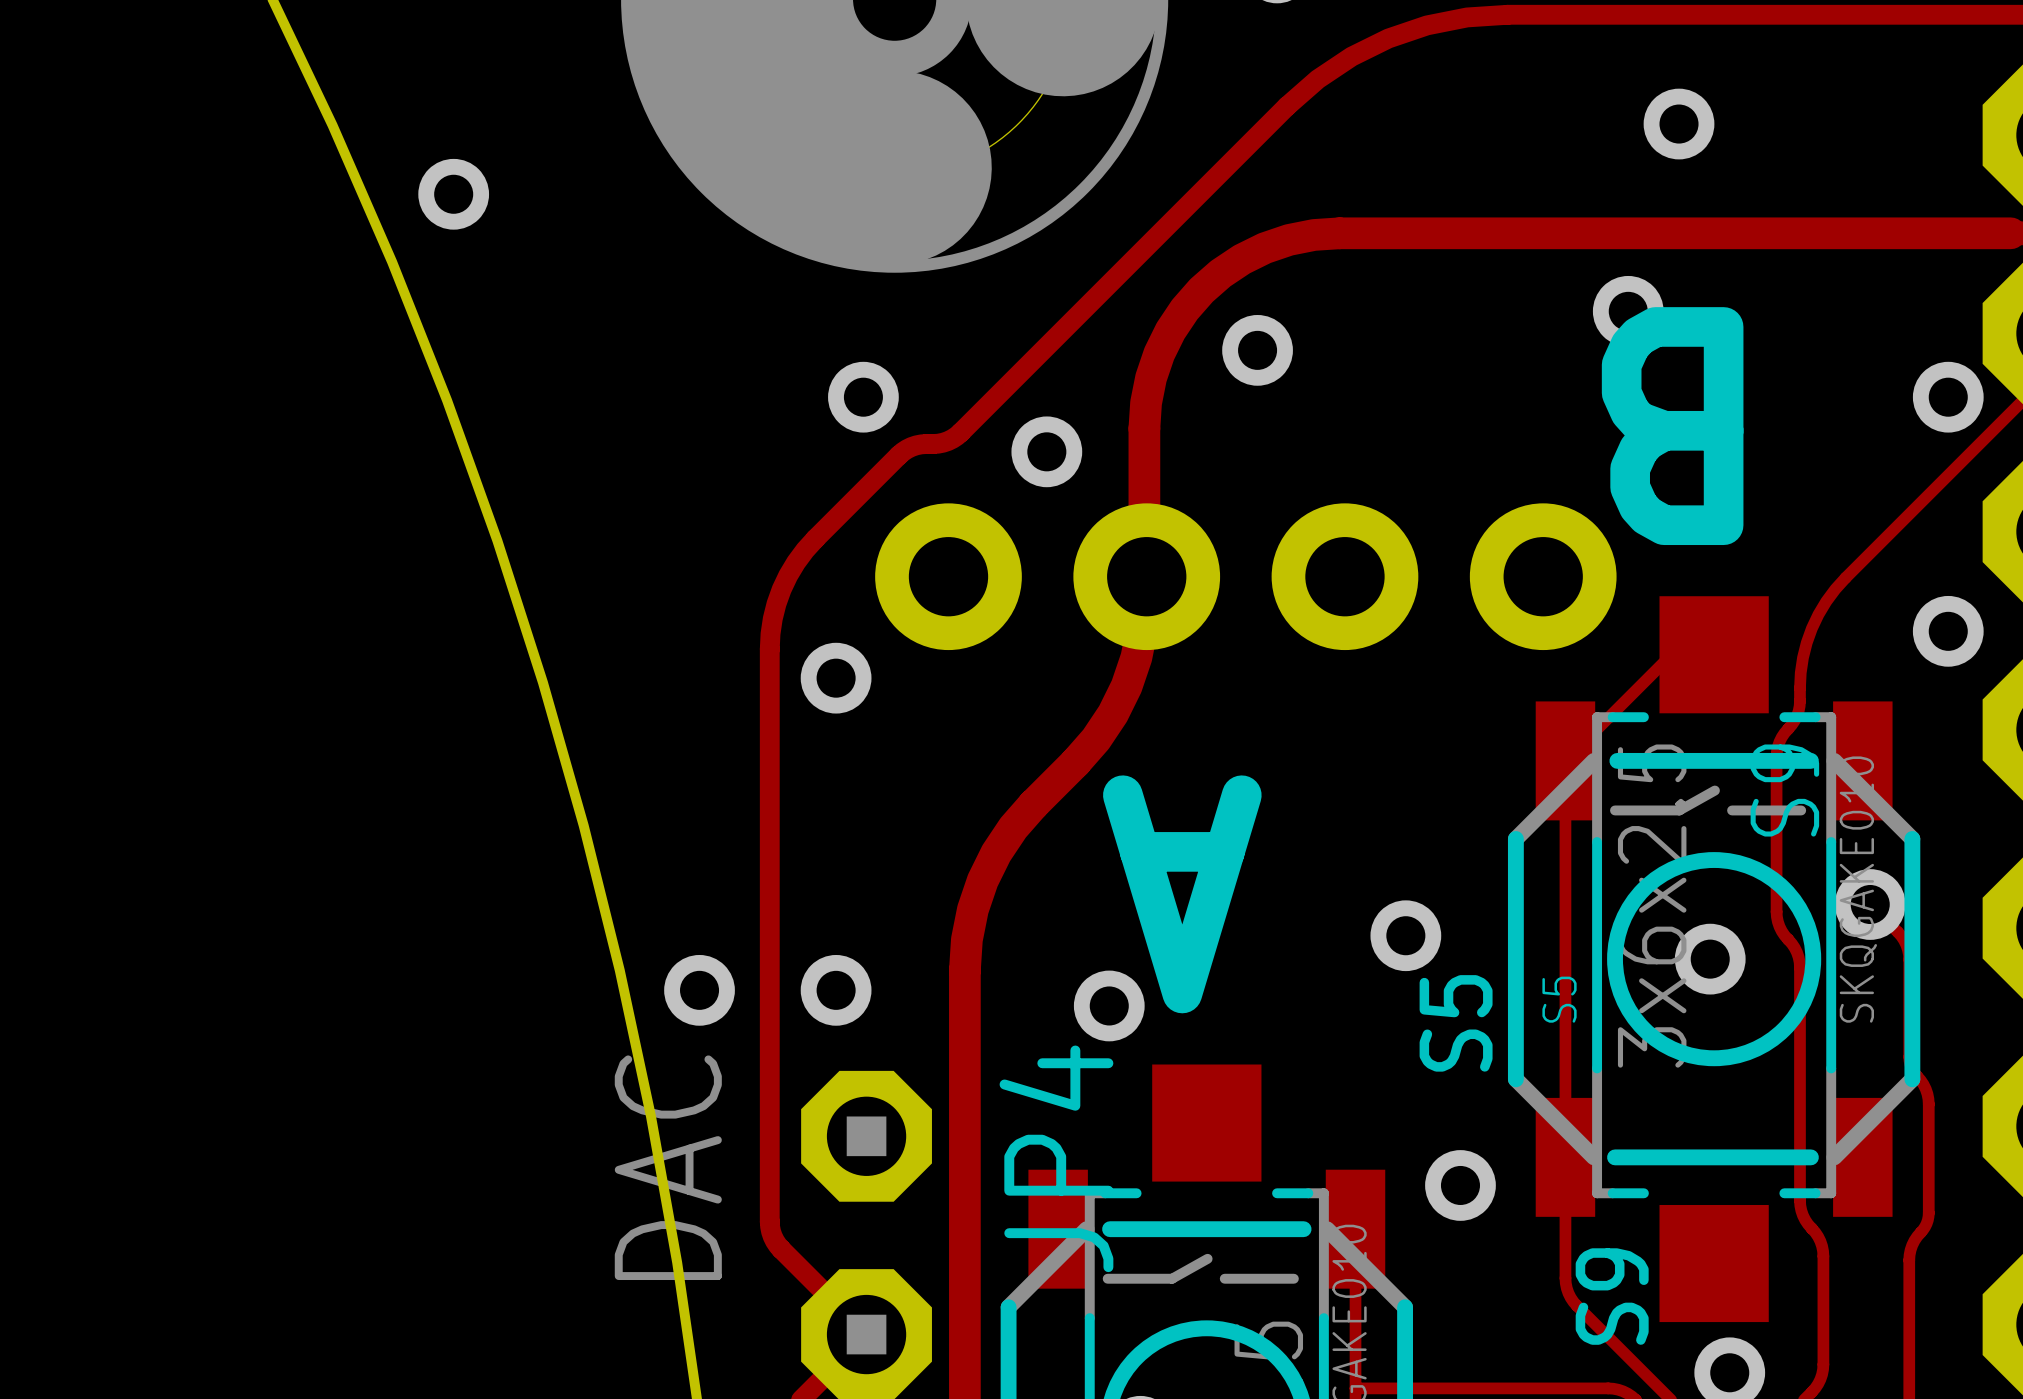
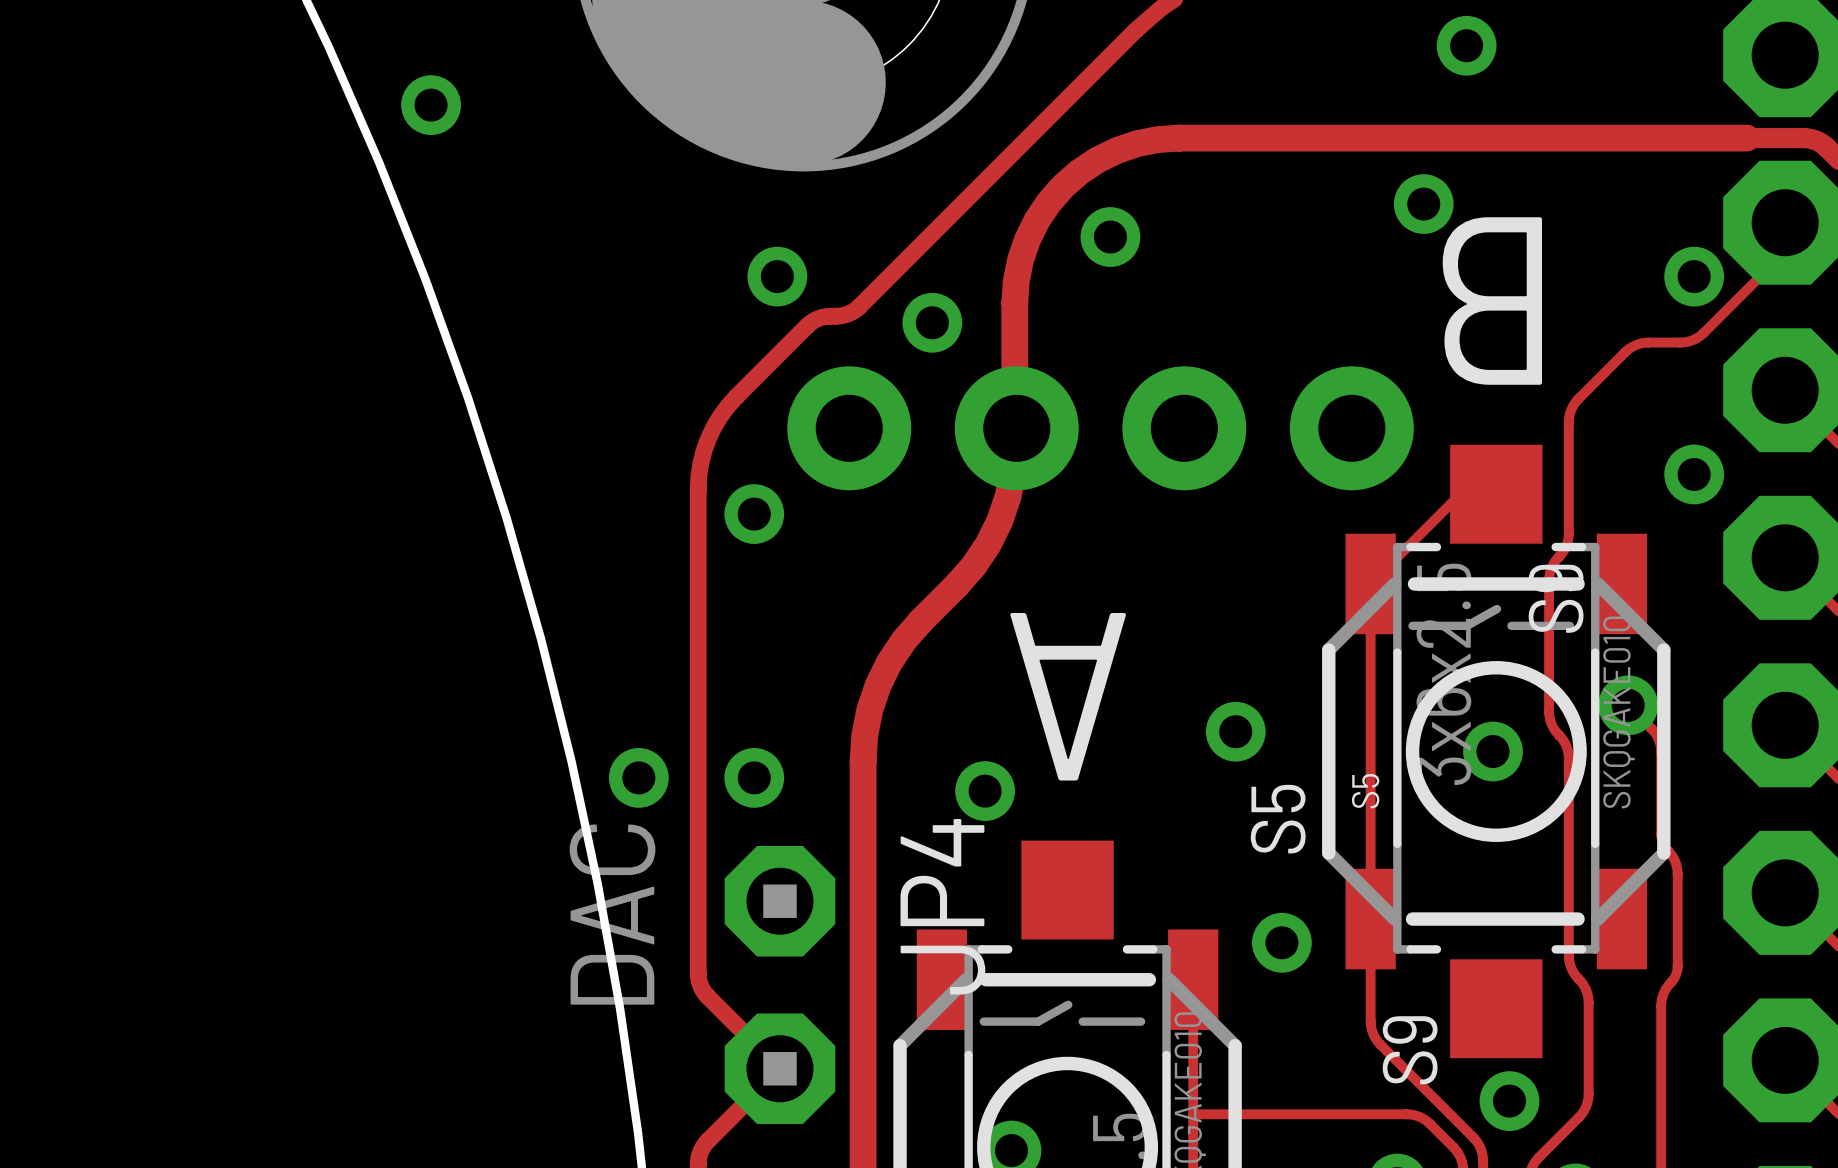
track: (1959, 463) (1845, 577) (1826, 601) (1811, 628) (1806, 642) (1802, 657) (1799, 688) -> (1703, 332) (1697, 338) (1684, 342) (1644, 342) (1631, 346) (1575, 402) (1569, 413) (1568, 422) (1568, 522)

